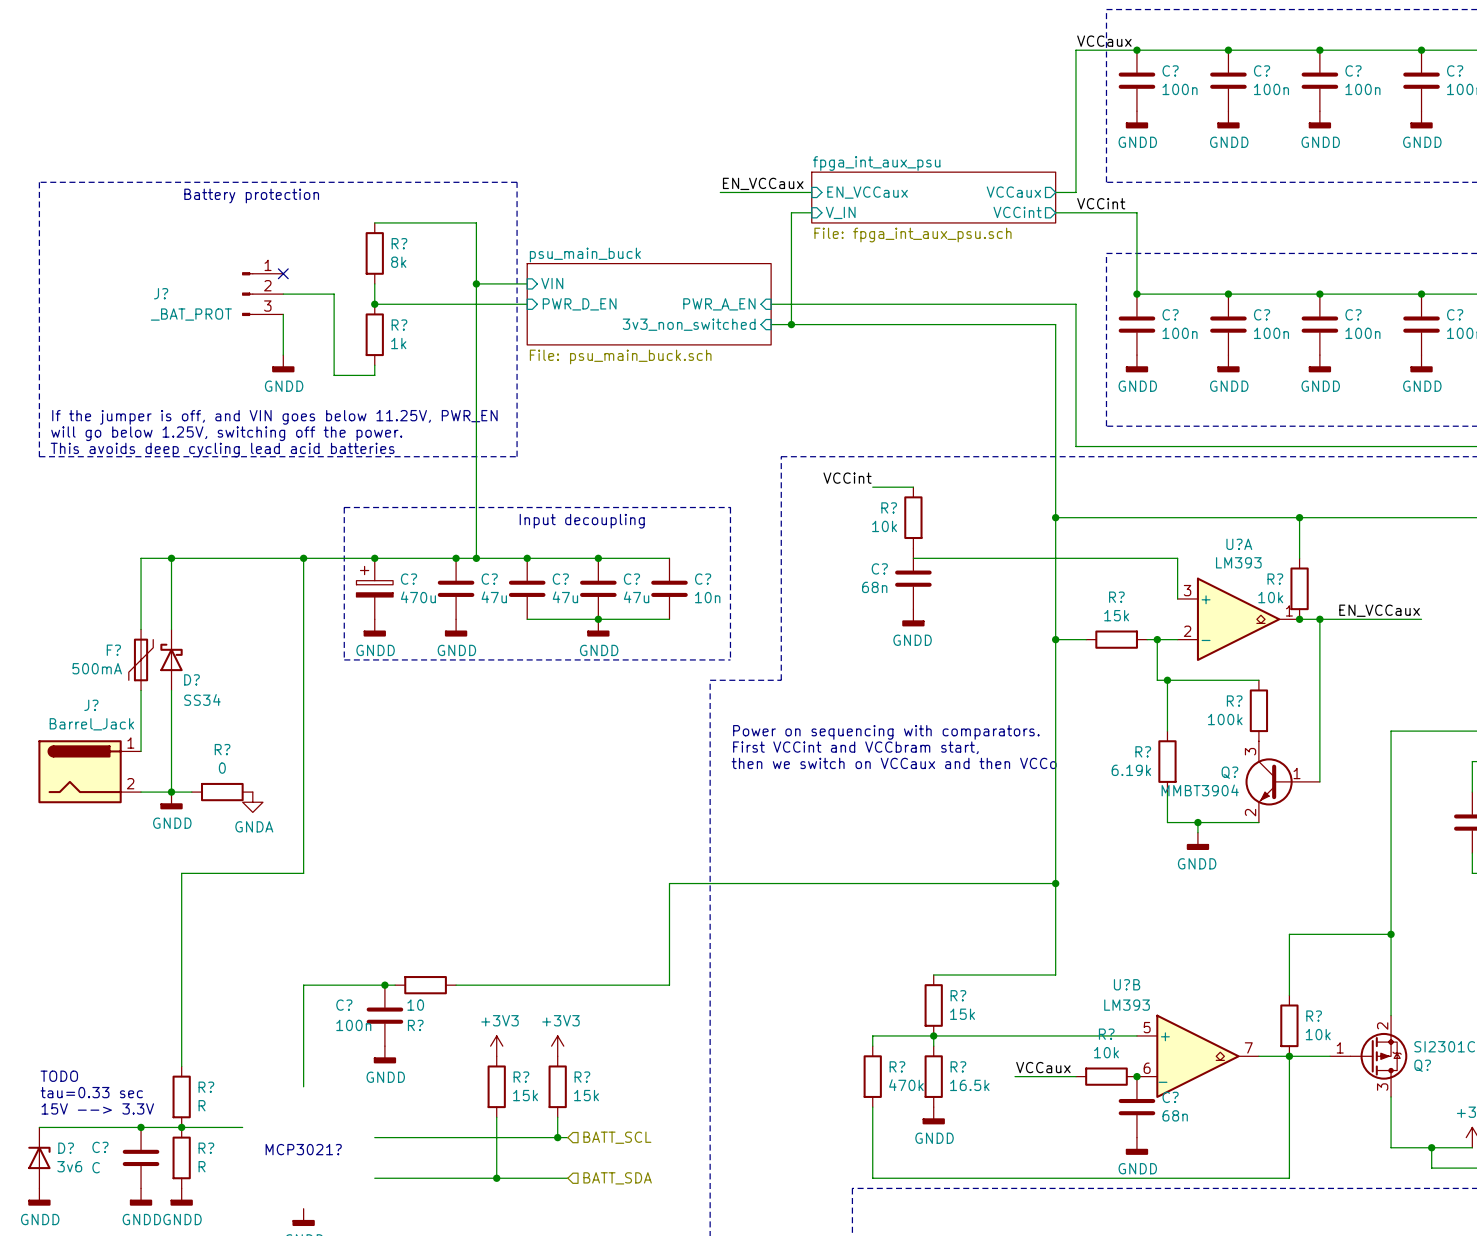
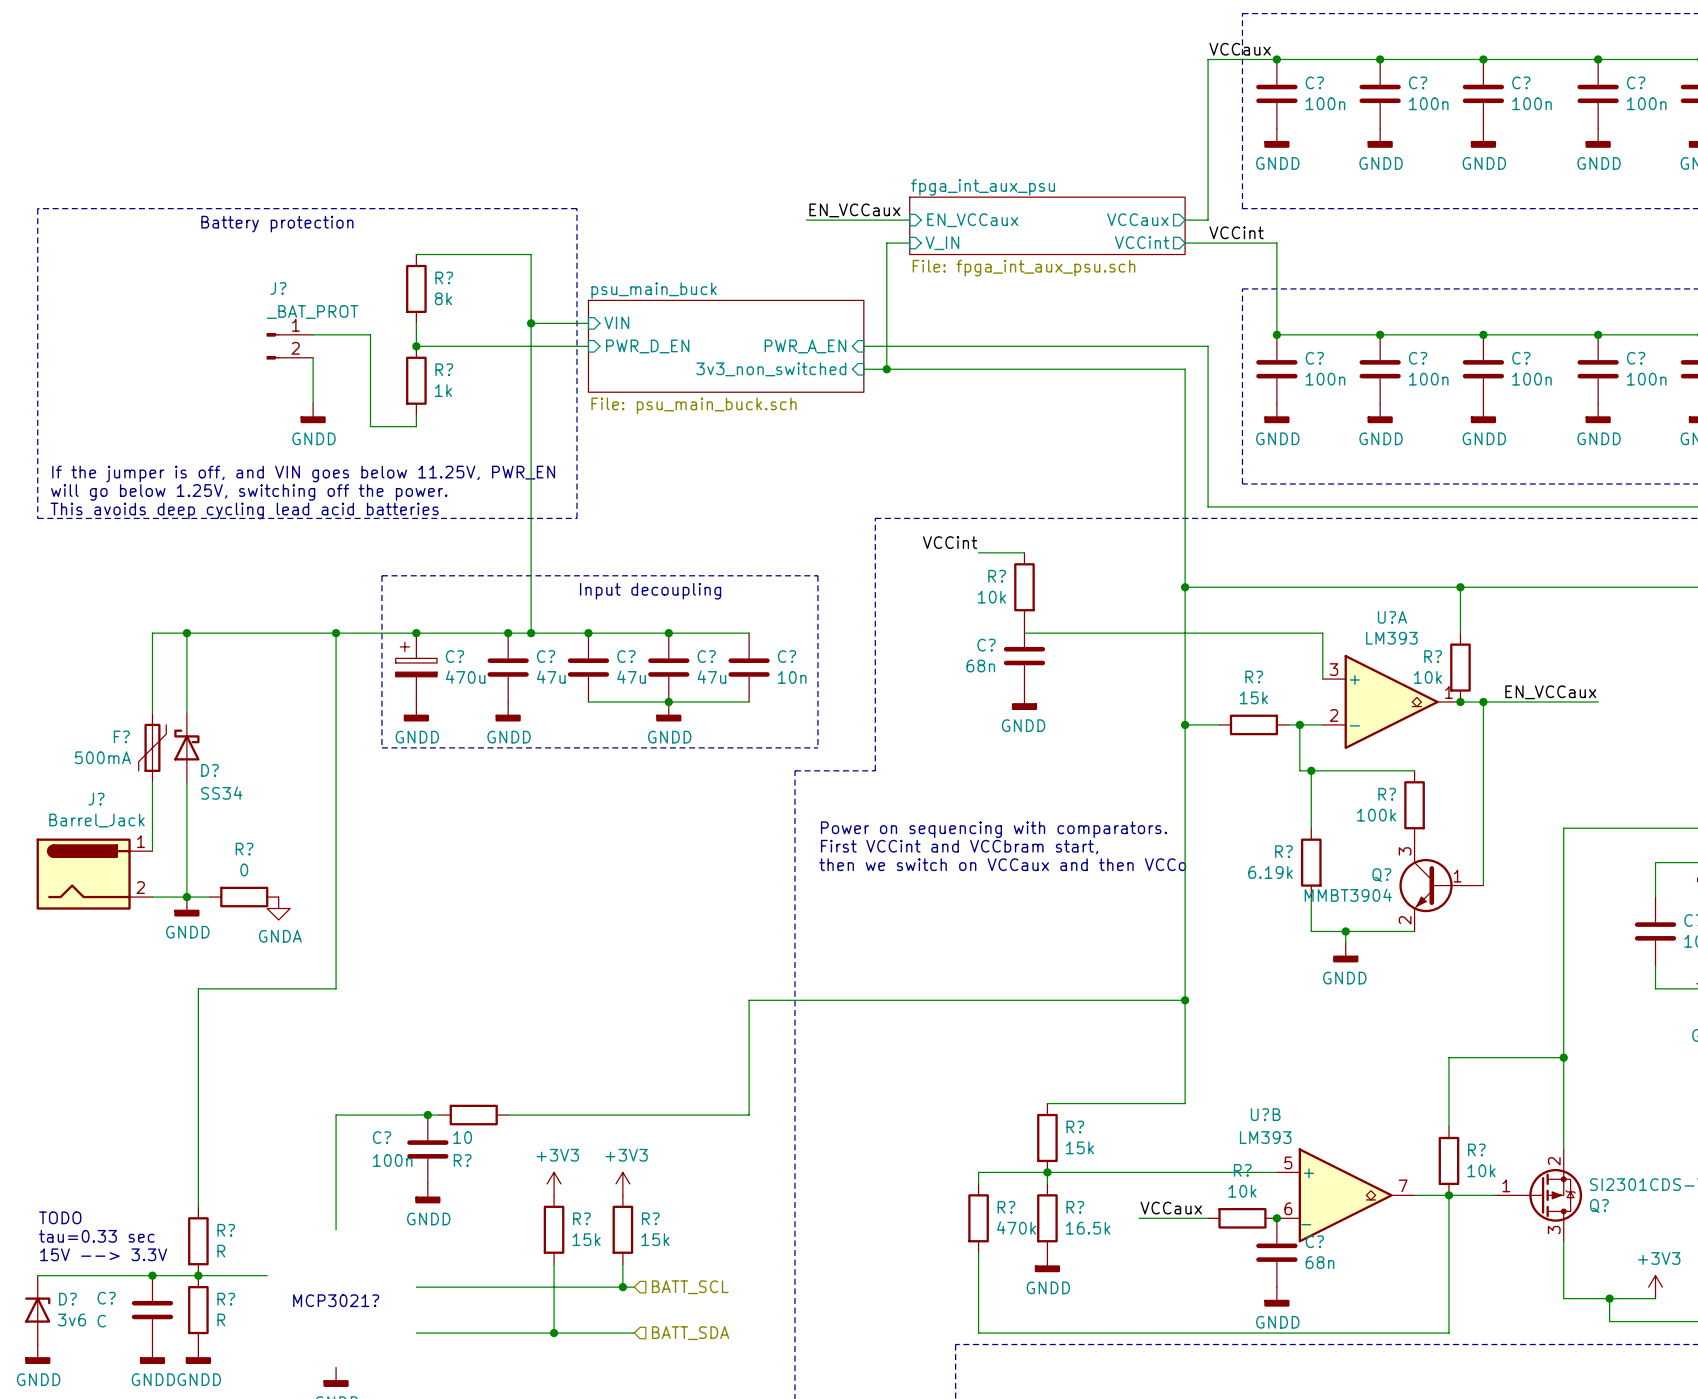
no-connect mark: (283, 273) -> none
J?: _BAT_PROT (262, 294) -> none
J?: none -> _BAT_PROT (289, 346)

